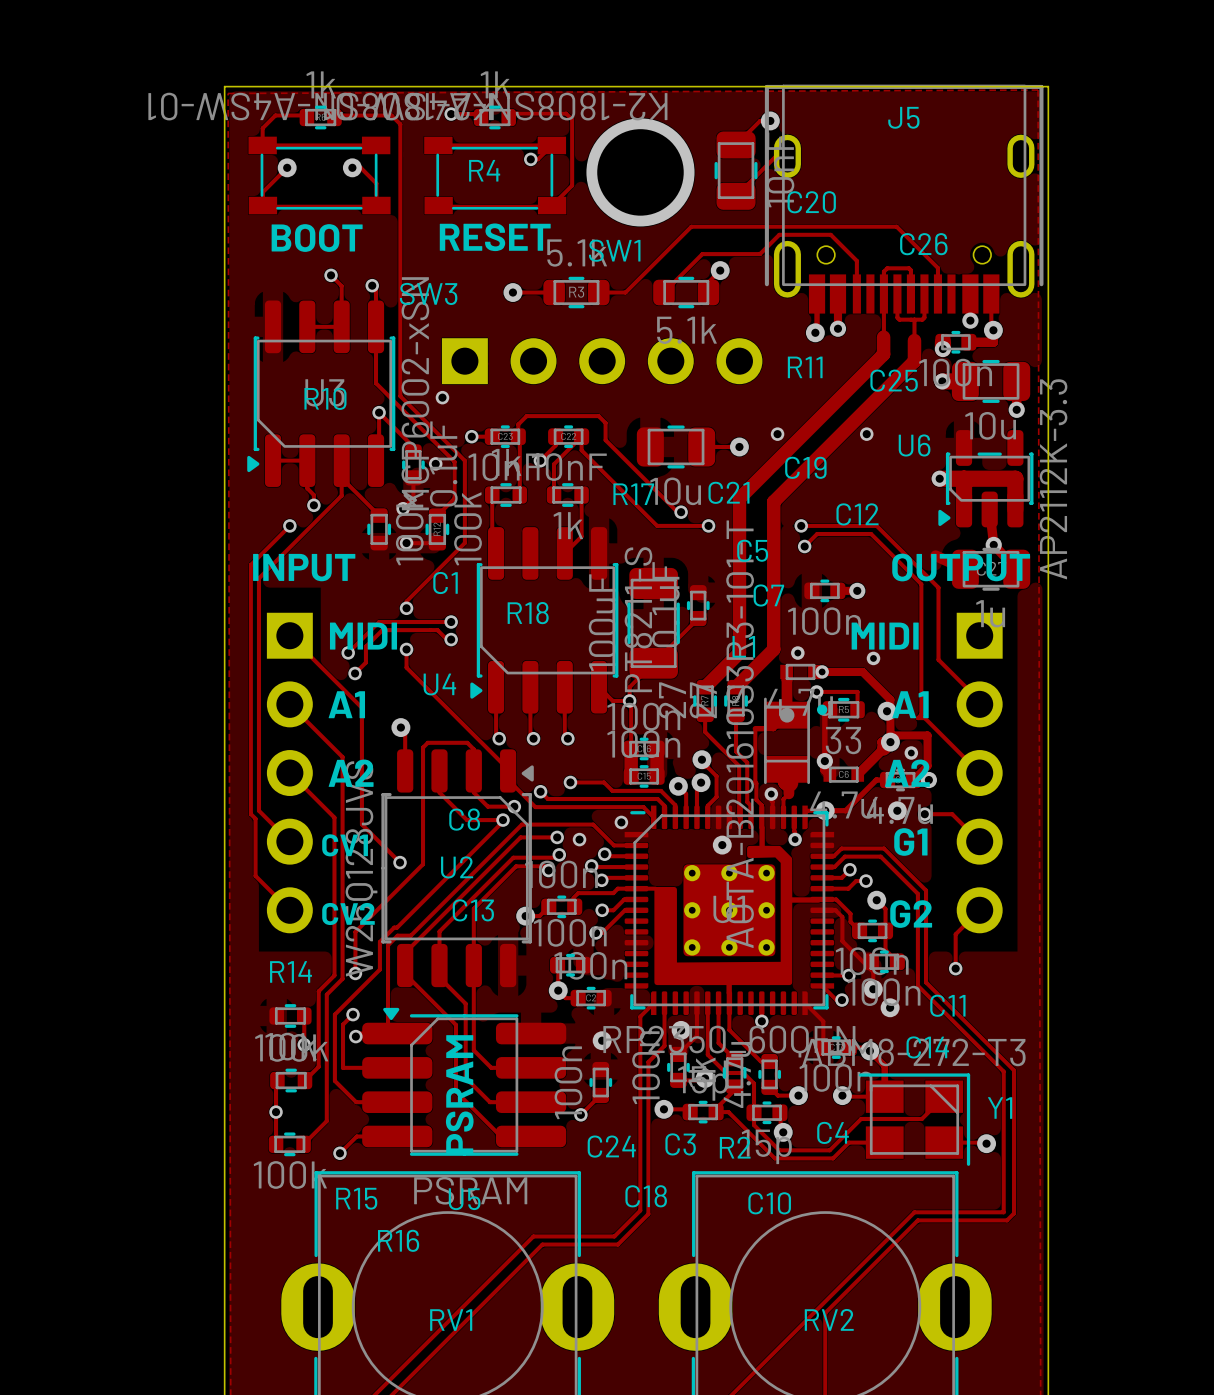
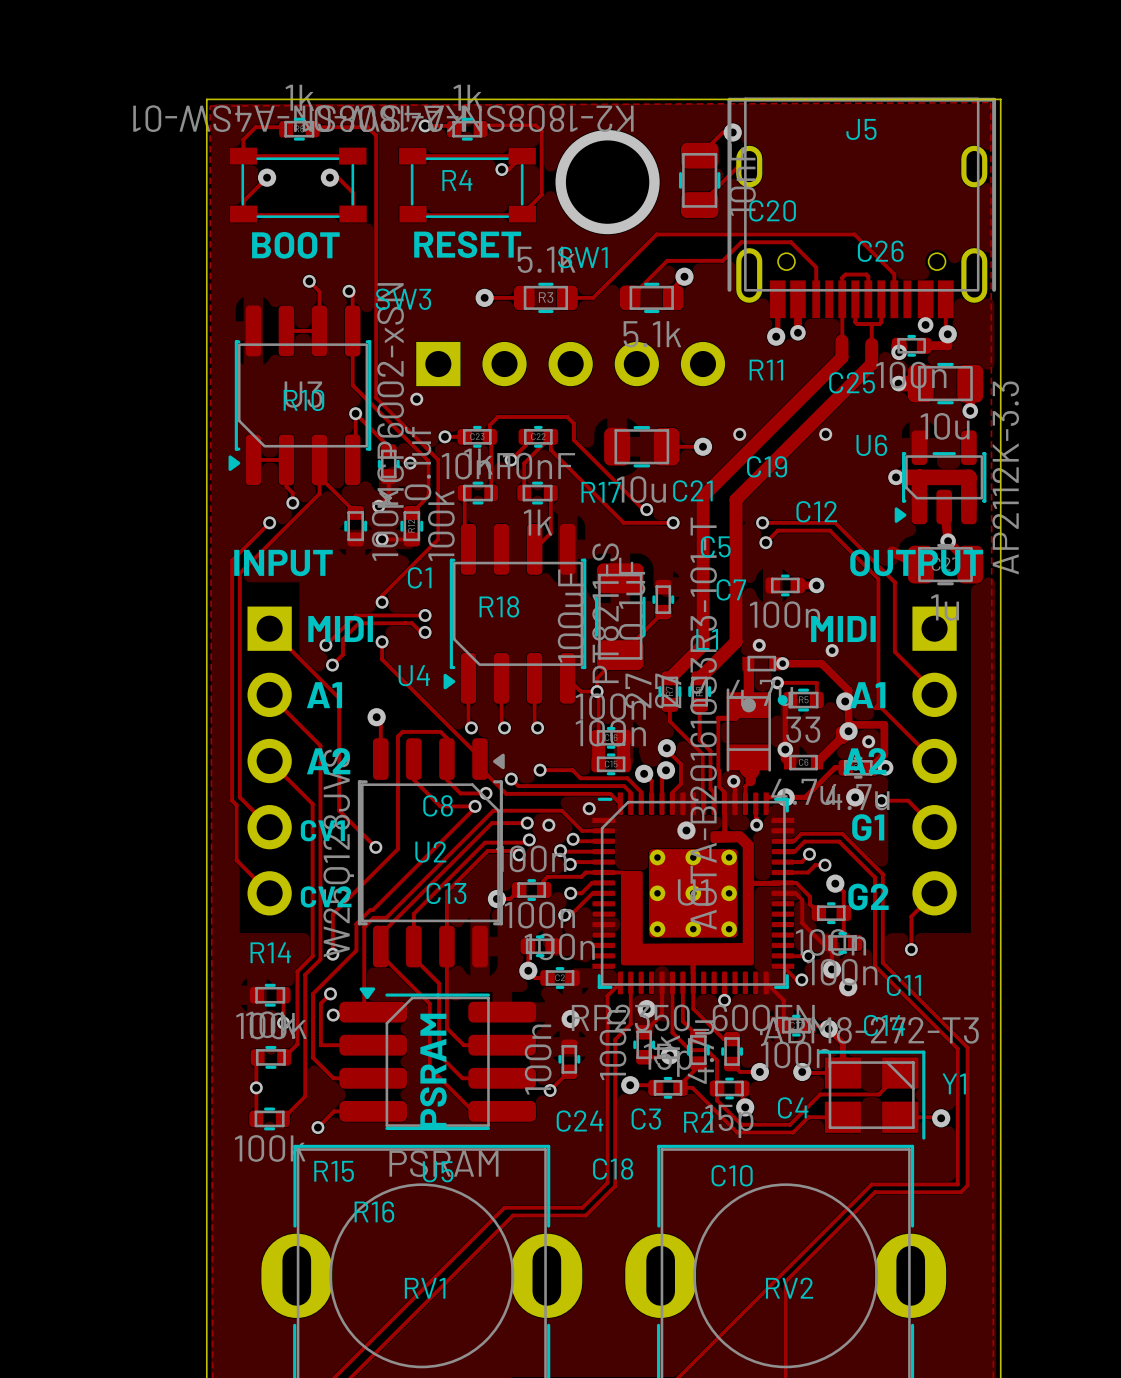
C1 value: 0.1uF (443, 463) -> 0.1uf (417, 463)

